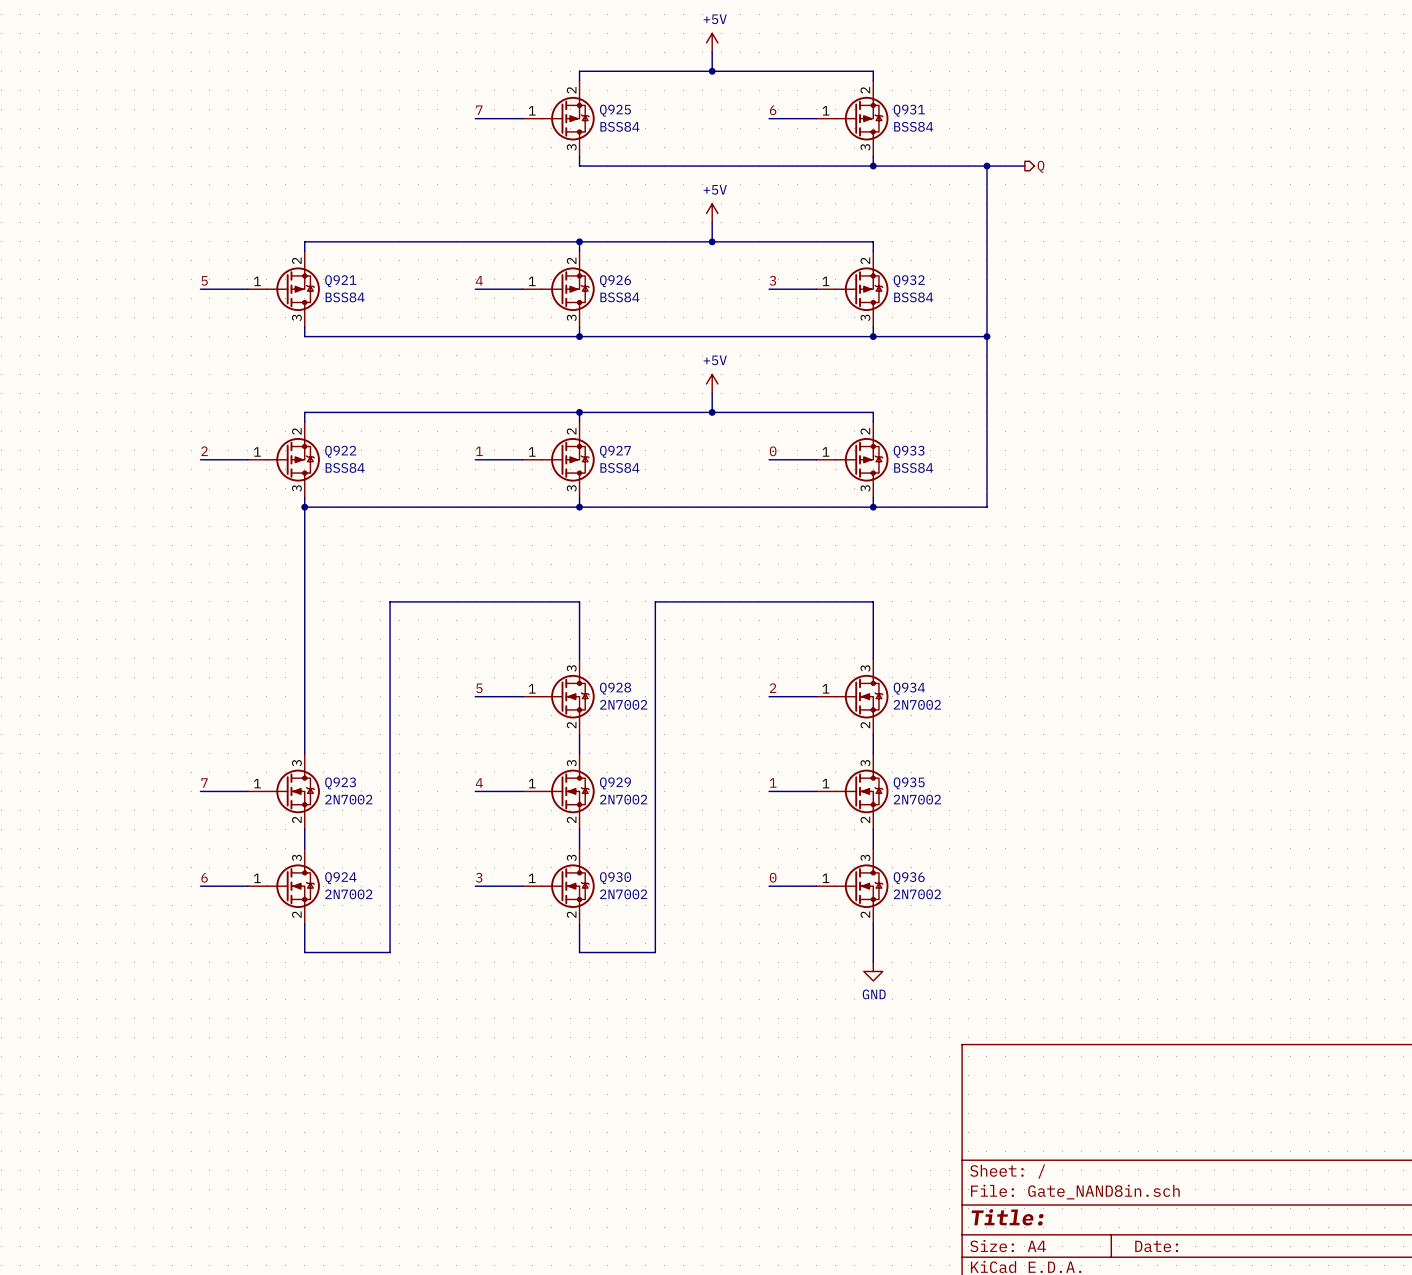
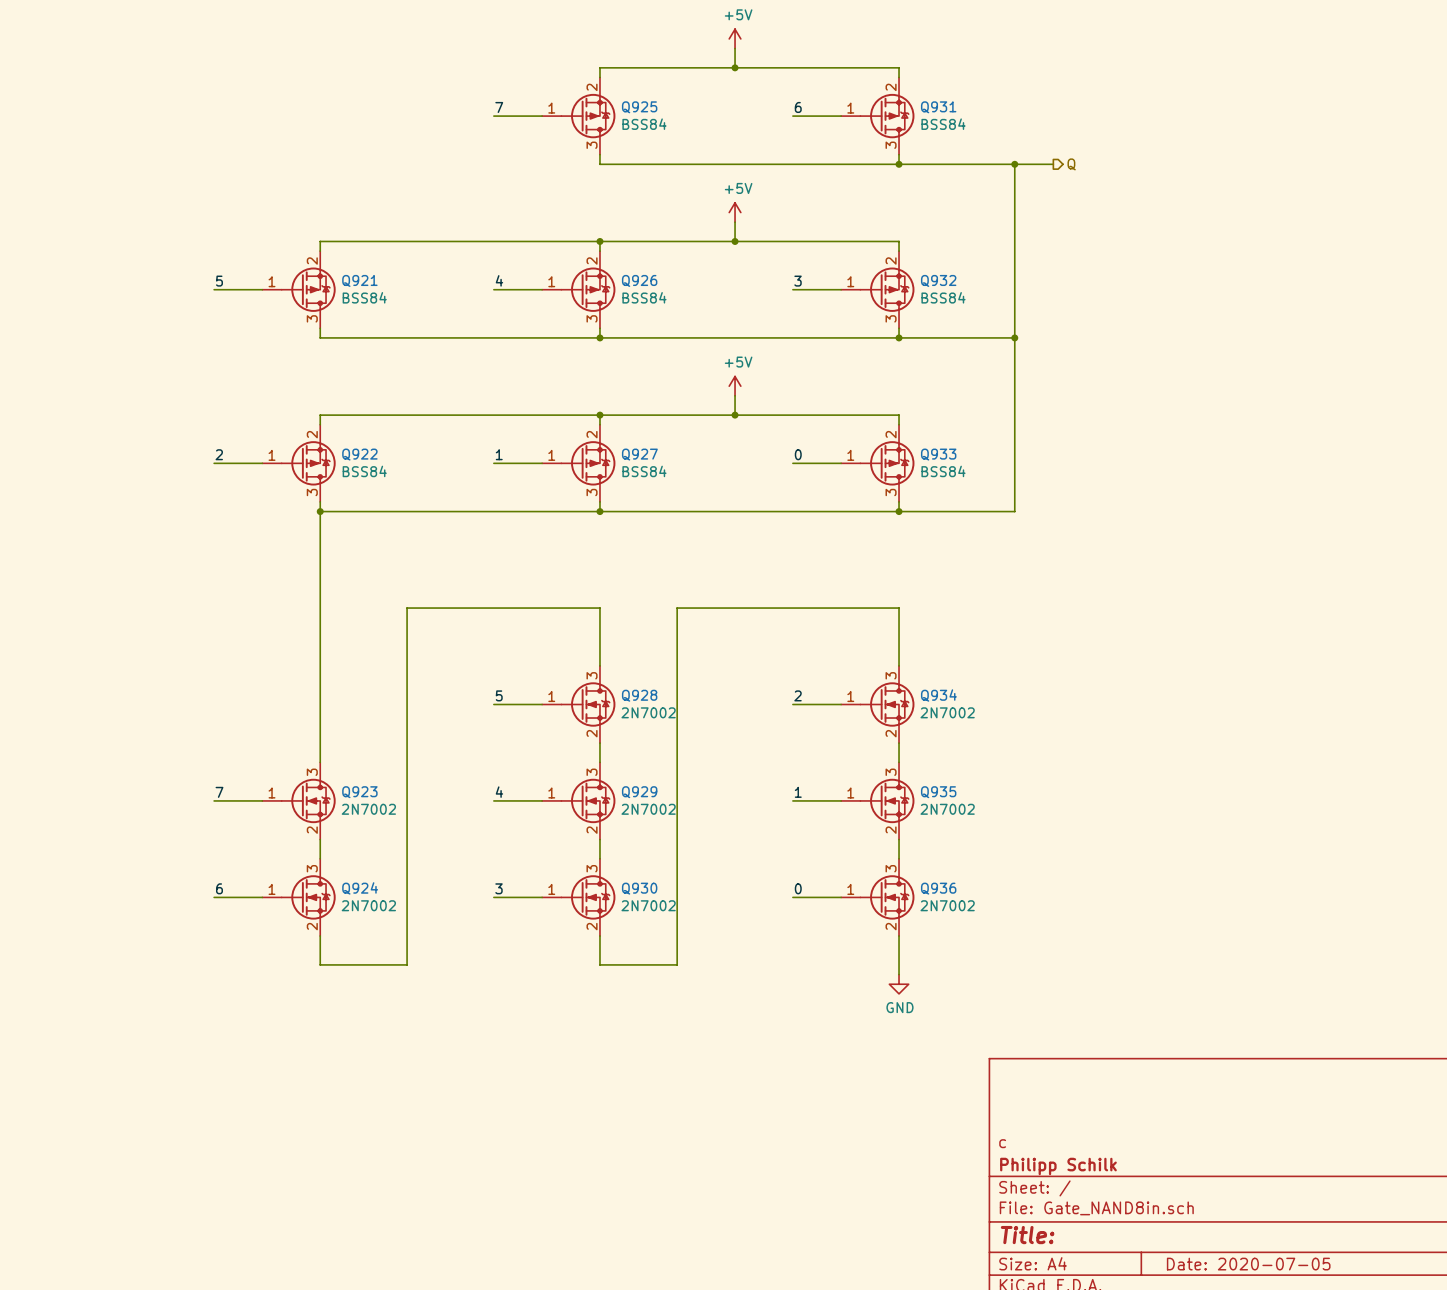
title block: none -> c (1002, 1143)
title block: none -> Philipp Schilk (1058, 1166)
title block: Date: (1156, 1246) -> Date: 2020-07-05 (1248, 1264)

